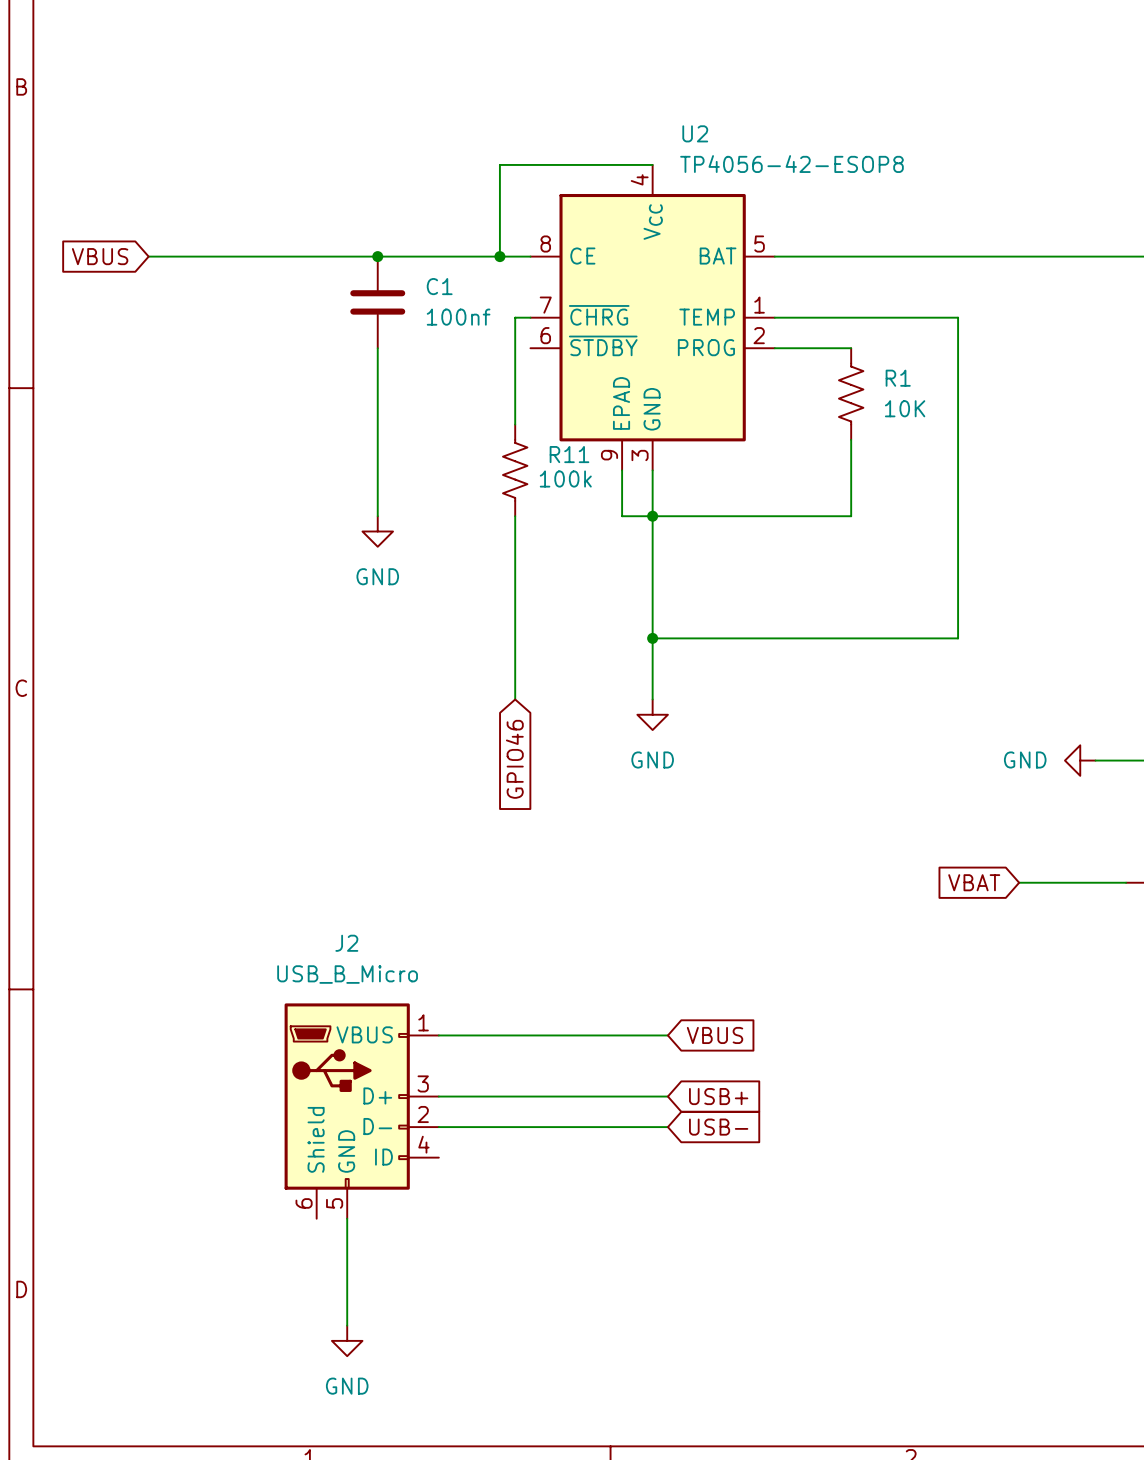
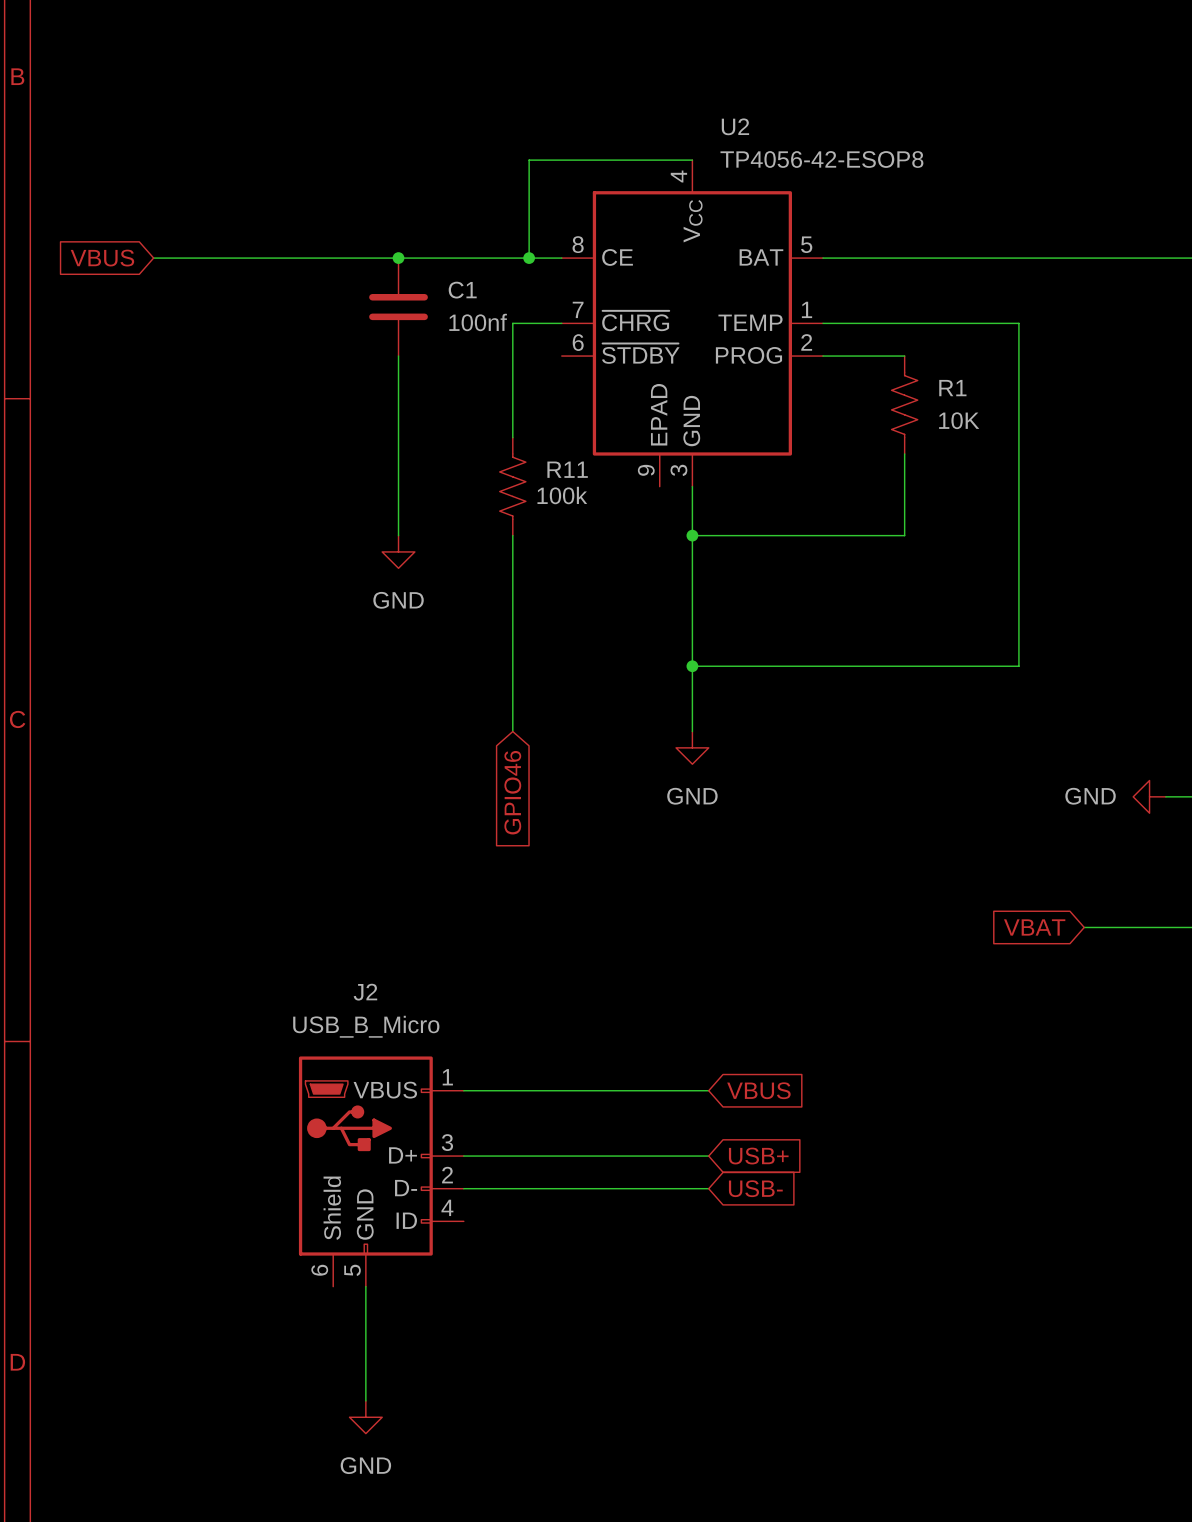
wire: (515, 317) (515, 424) -> (545, 323) (512, 323) (512, 437)
R11 position: (515, 470) -> (512, 486)
wire: (622, 470) (622, 516) (652, 516) -> none
wire: (515, 516) (515, 699) -> (512, 535) (512, 731)
global label position: GPIO46 (514, 759) -> GPIO46 (512, 792)

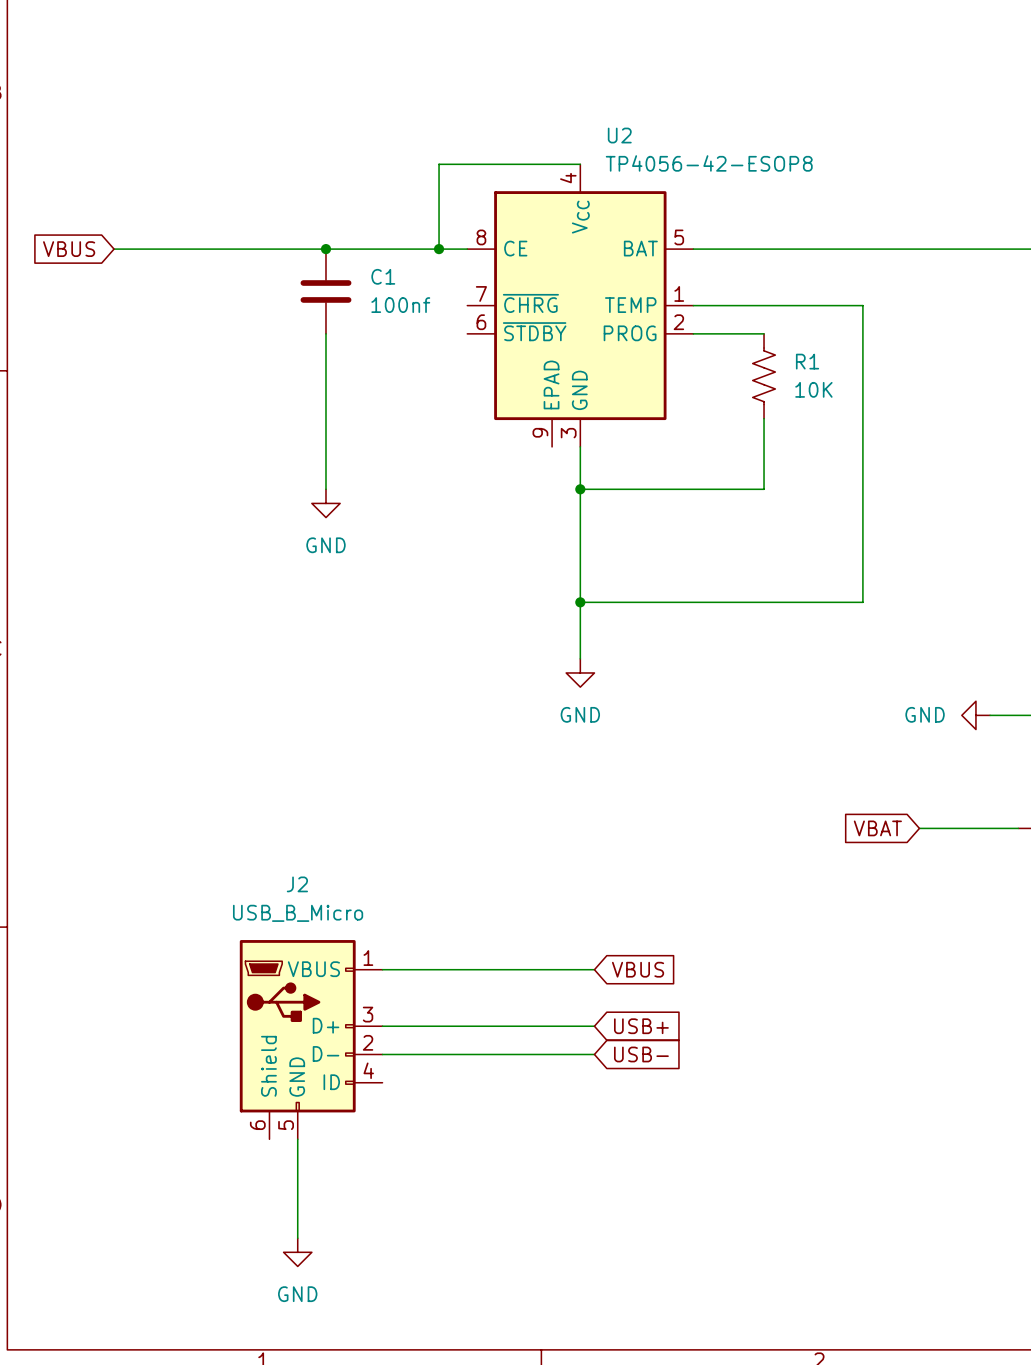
wire: (561, 323) (512, 323) (512, 437) -> none
R11: 100k (512, 486) -> none
wire: (512, 535) (512, 731) -> none
global label: GPIO46 (512, 792) -> none

